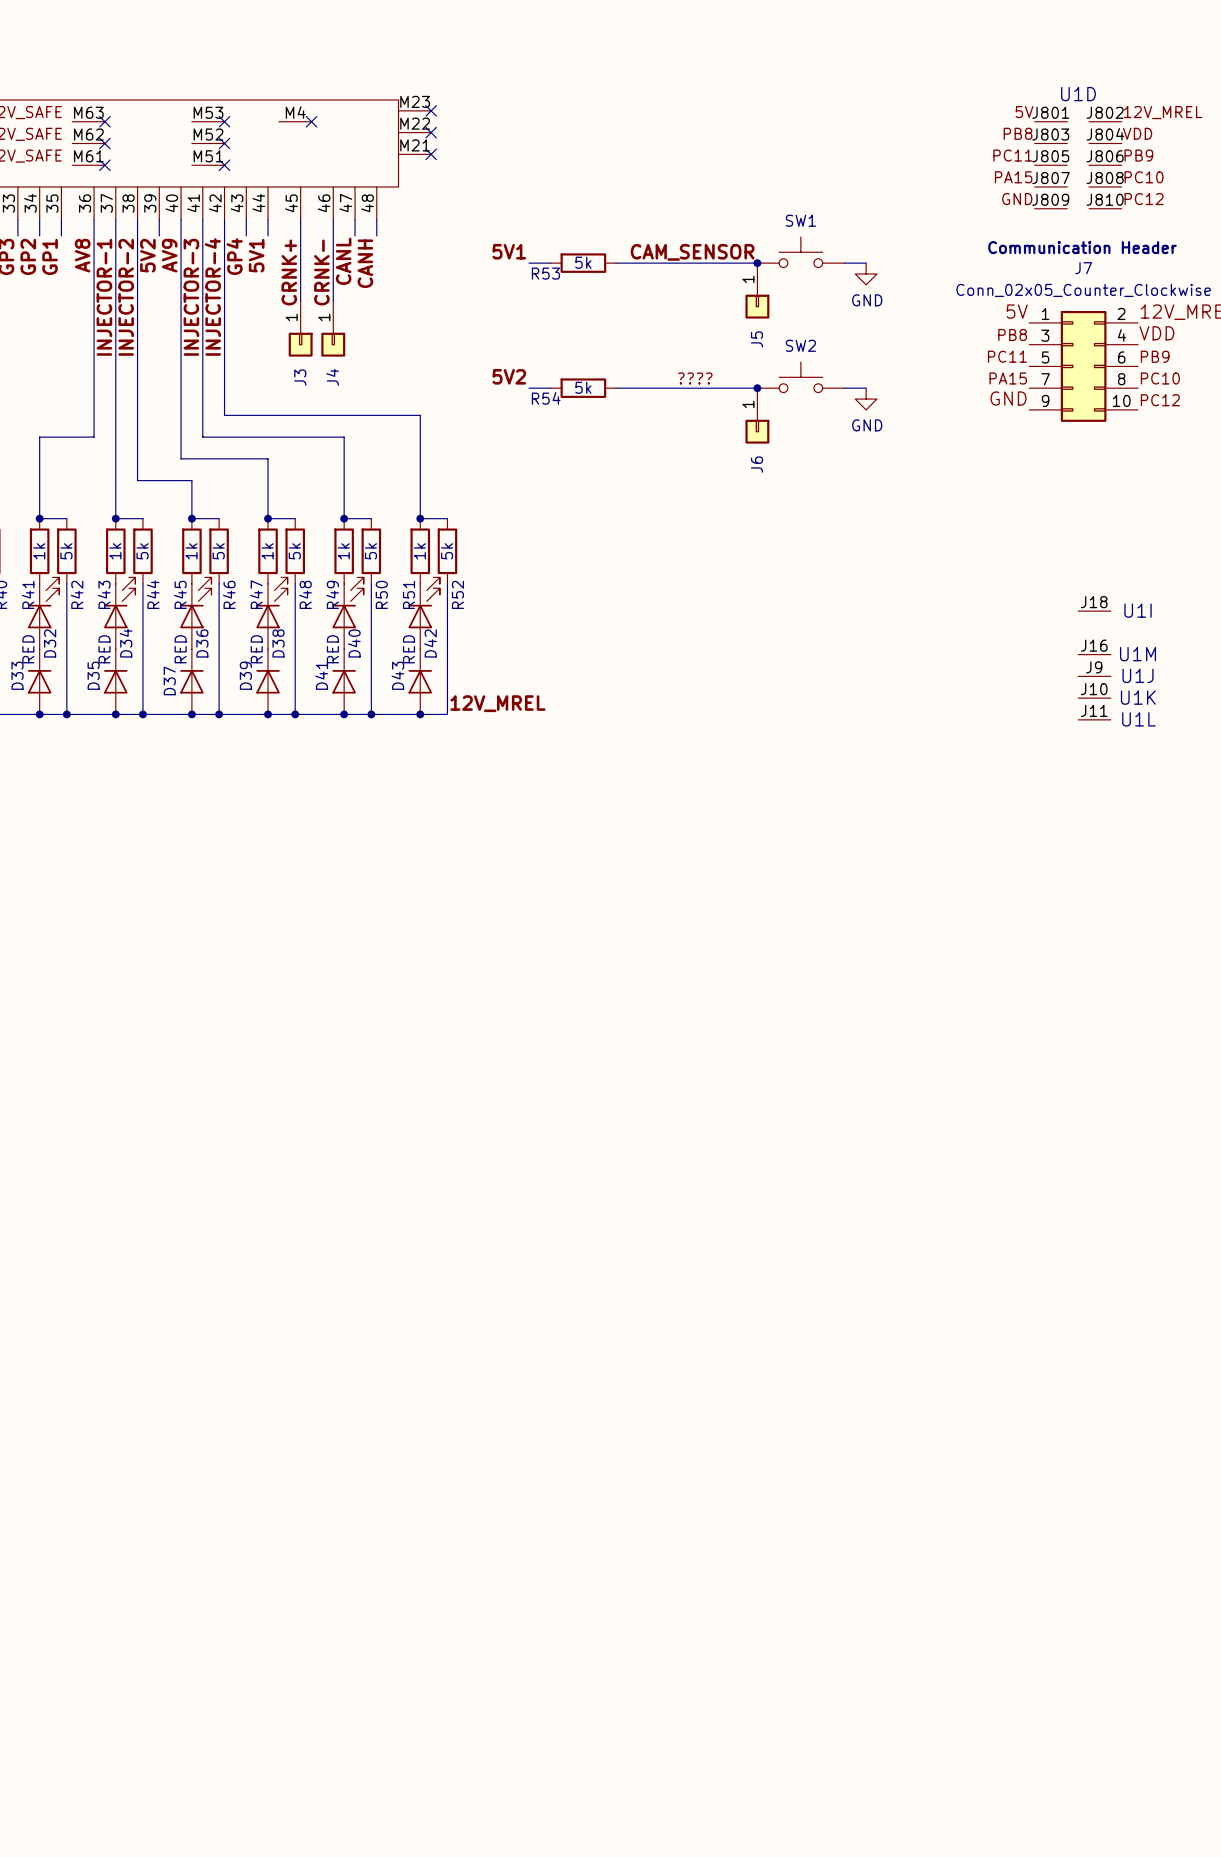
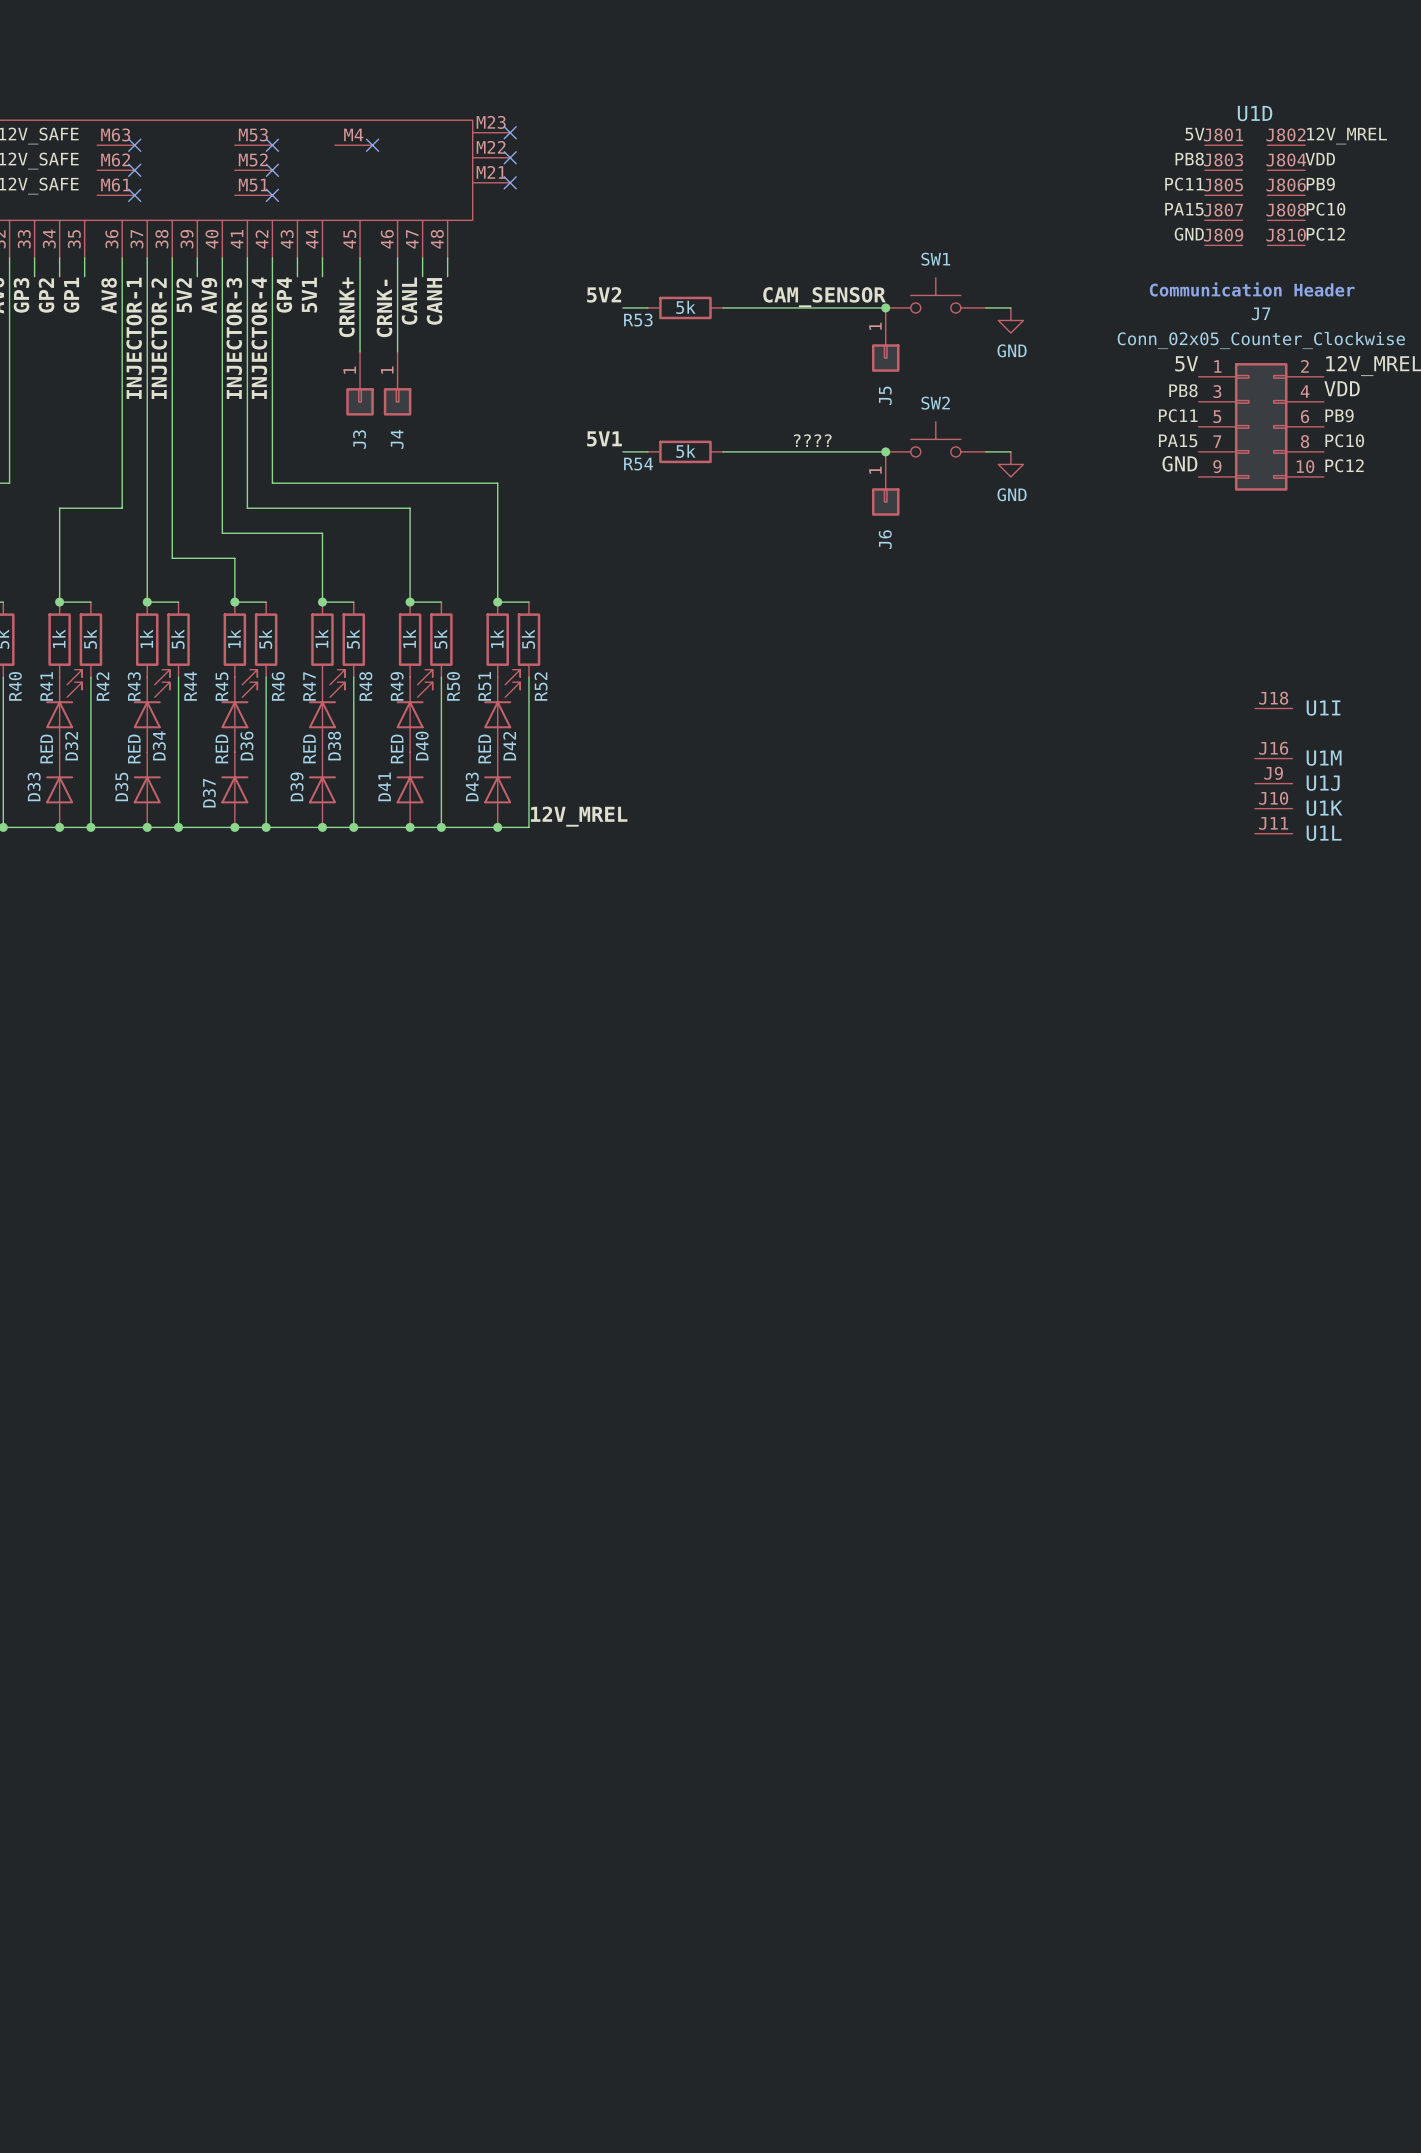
label: 5V1 (509, 251) -> 5V2 (604, 294)
label: 5V2 (509, 376) -> 5V1 (604, 438)

